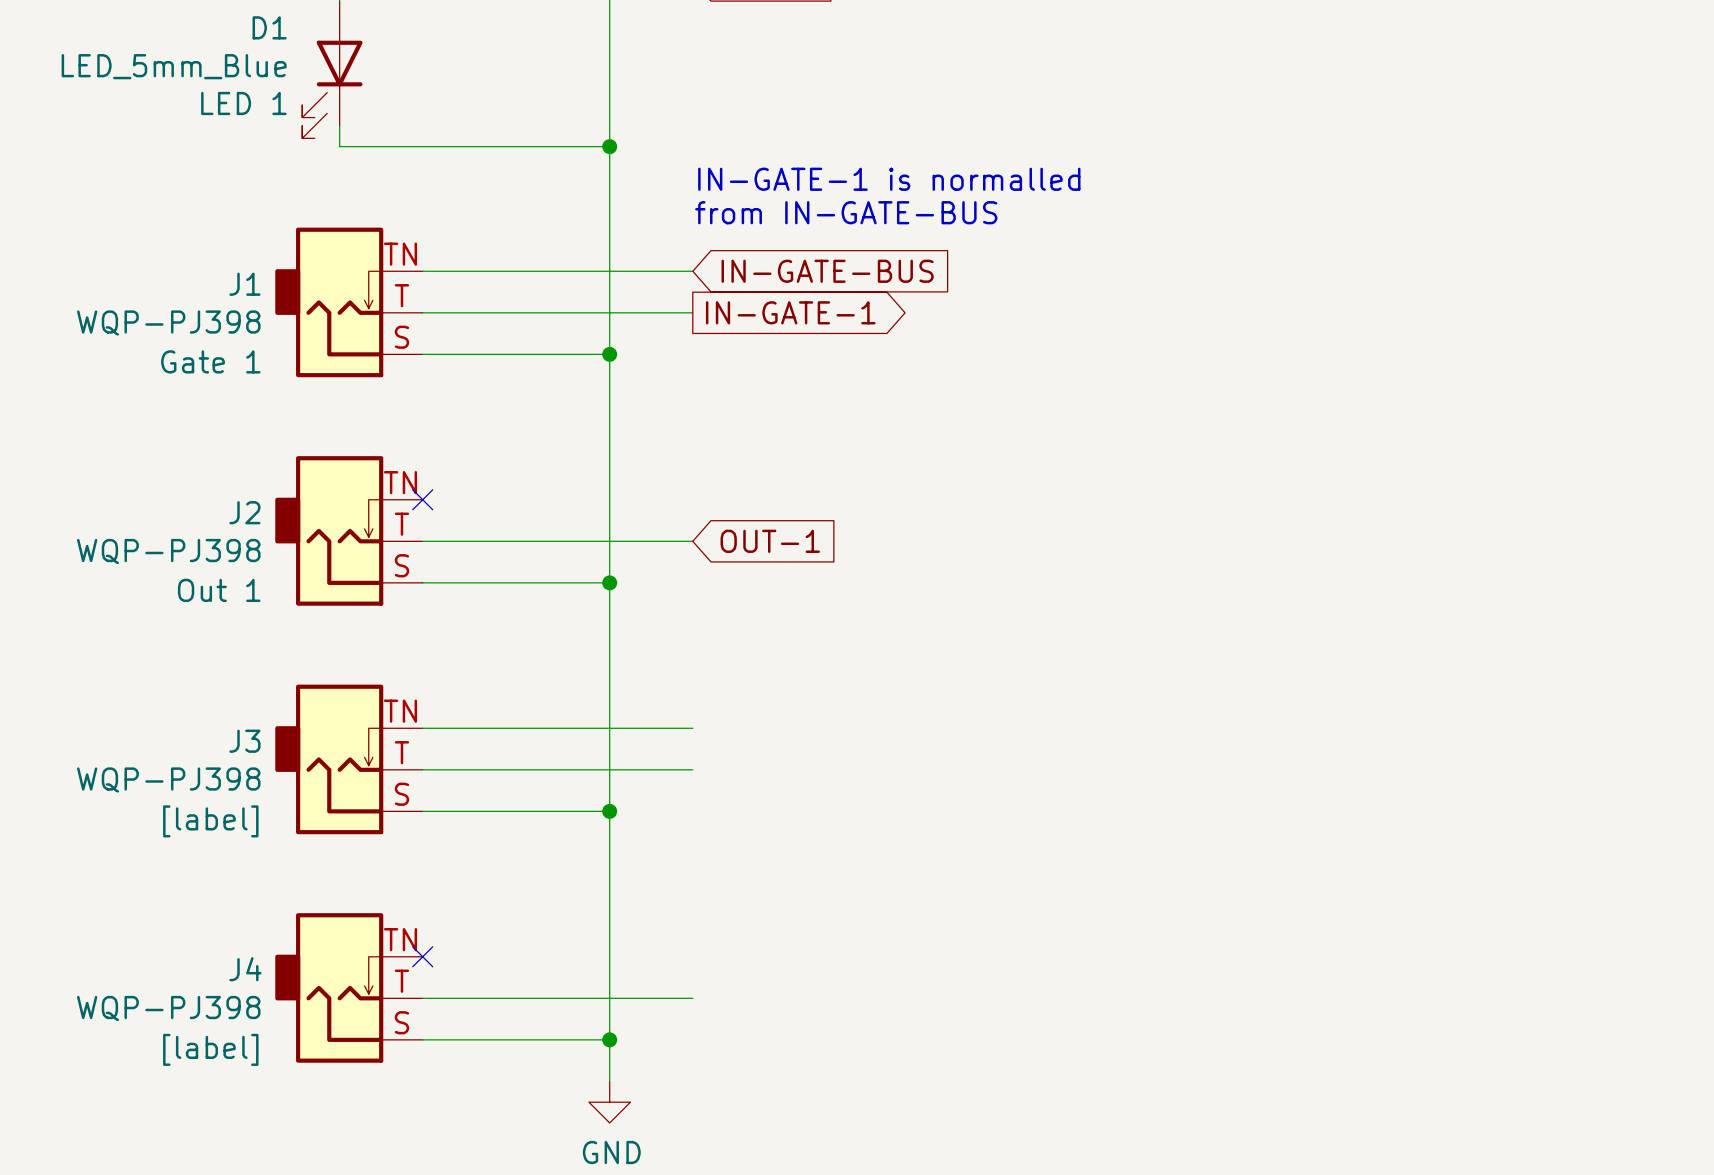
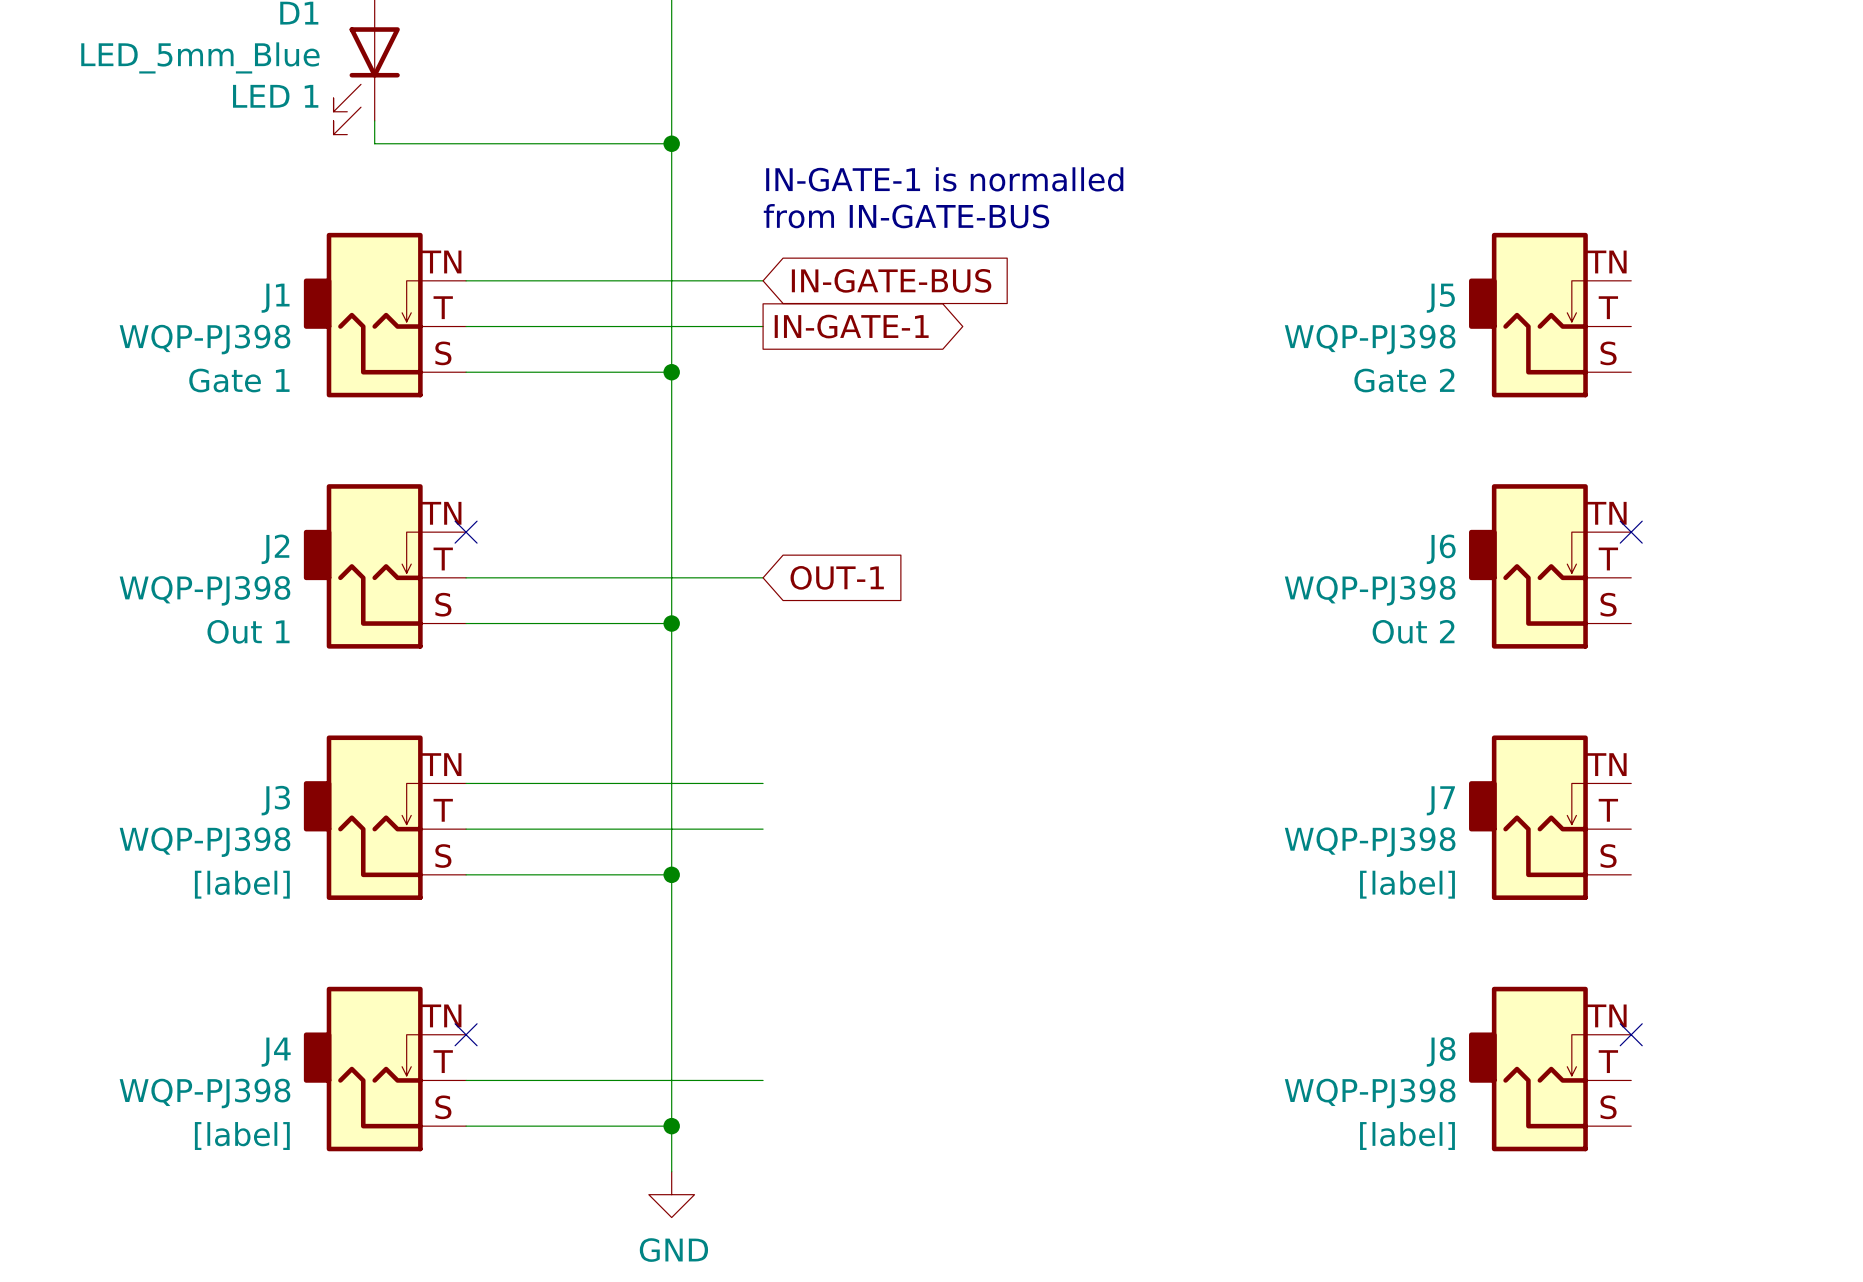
J5: none -> WQP-PJ398 (1550, 315)
no-connect mark: none -> (1631, 532)
J6: none -> WQP-PJ398 (1550, 566)
J7: none -> WQP-PJ398 (1550, 817)
no-connect mark: none -> (1631, 1034)
J8: none -> WQP-PJ398 (1550, 1069)

